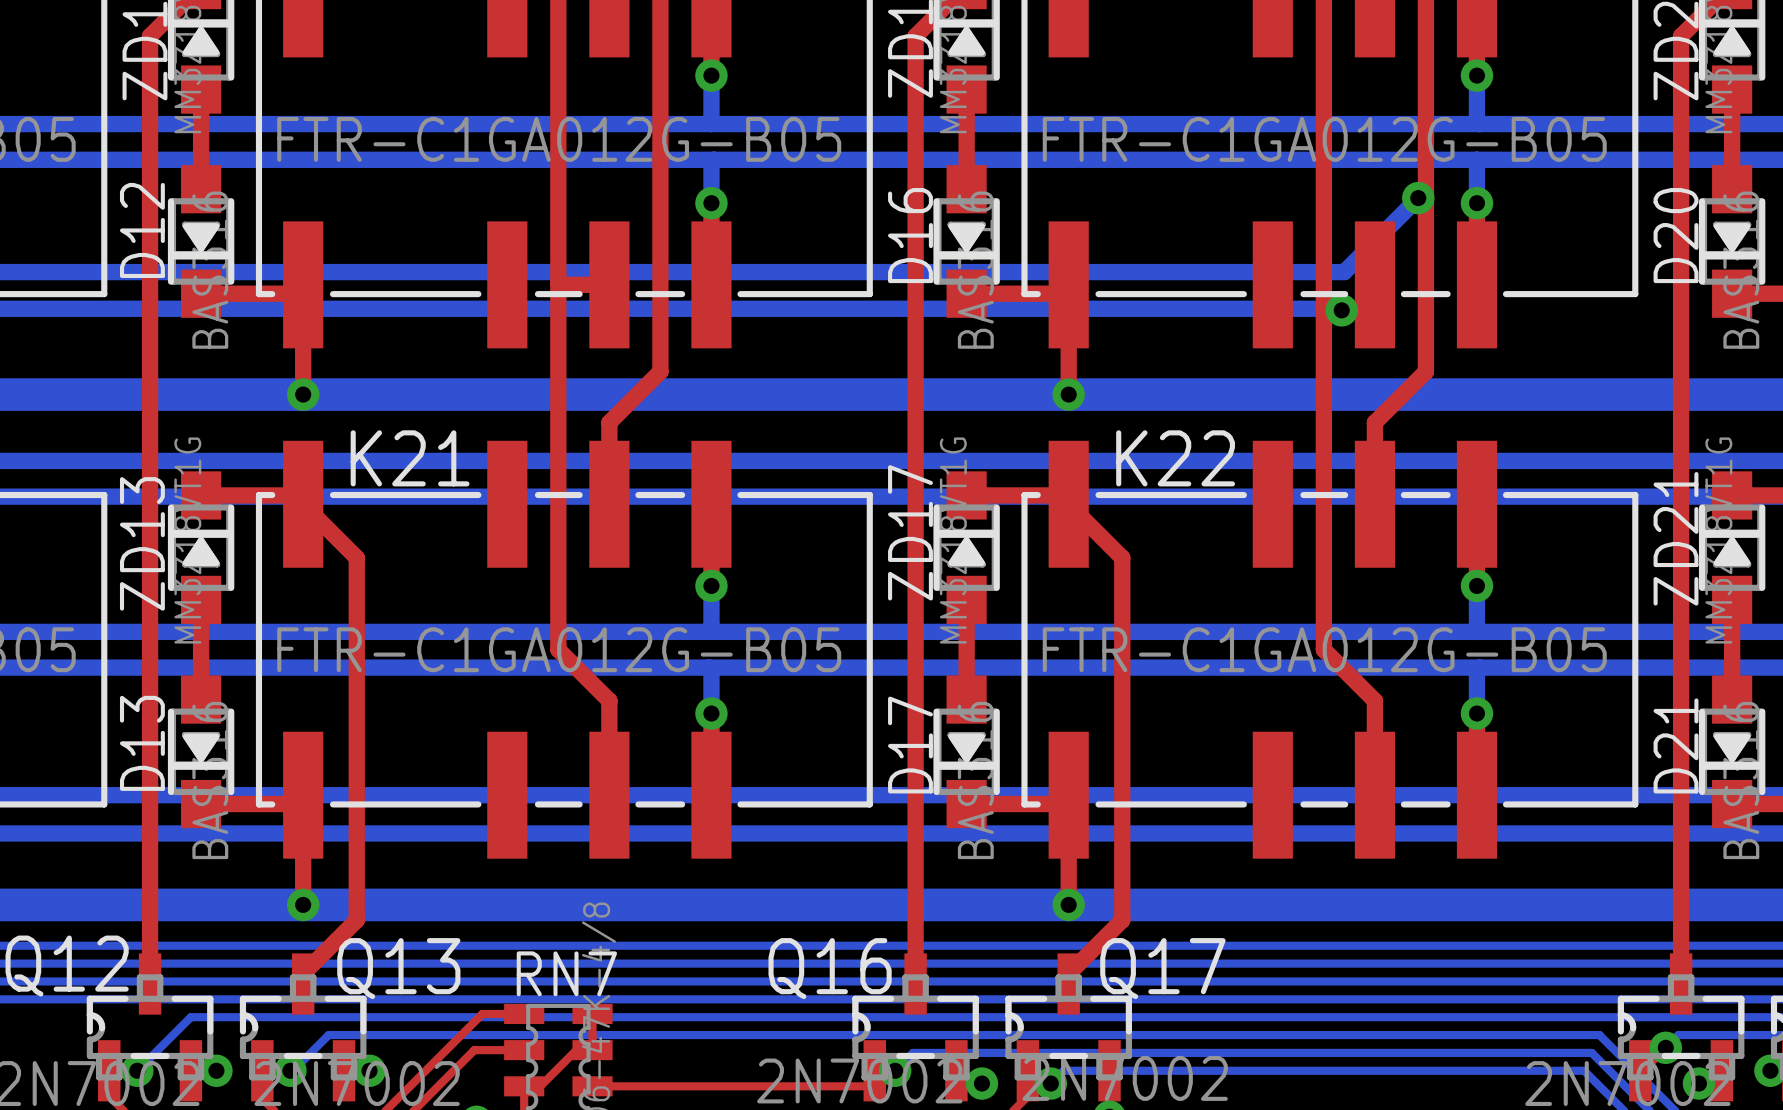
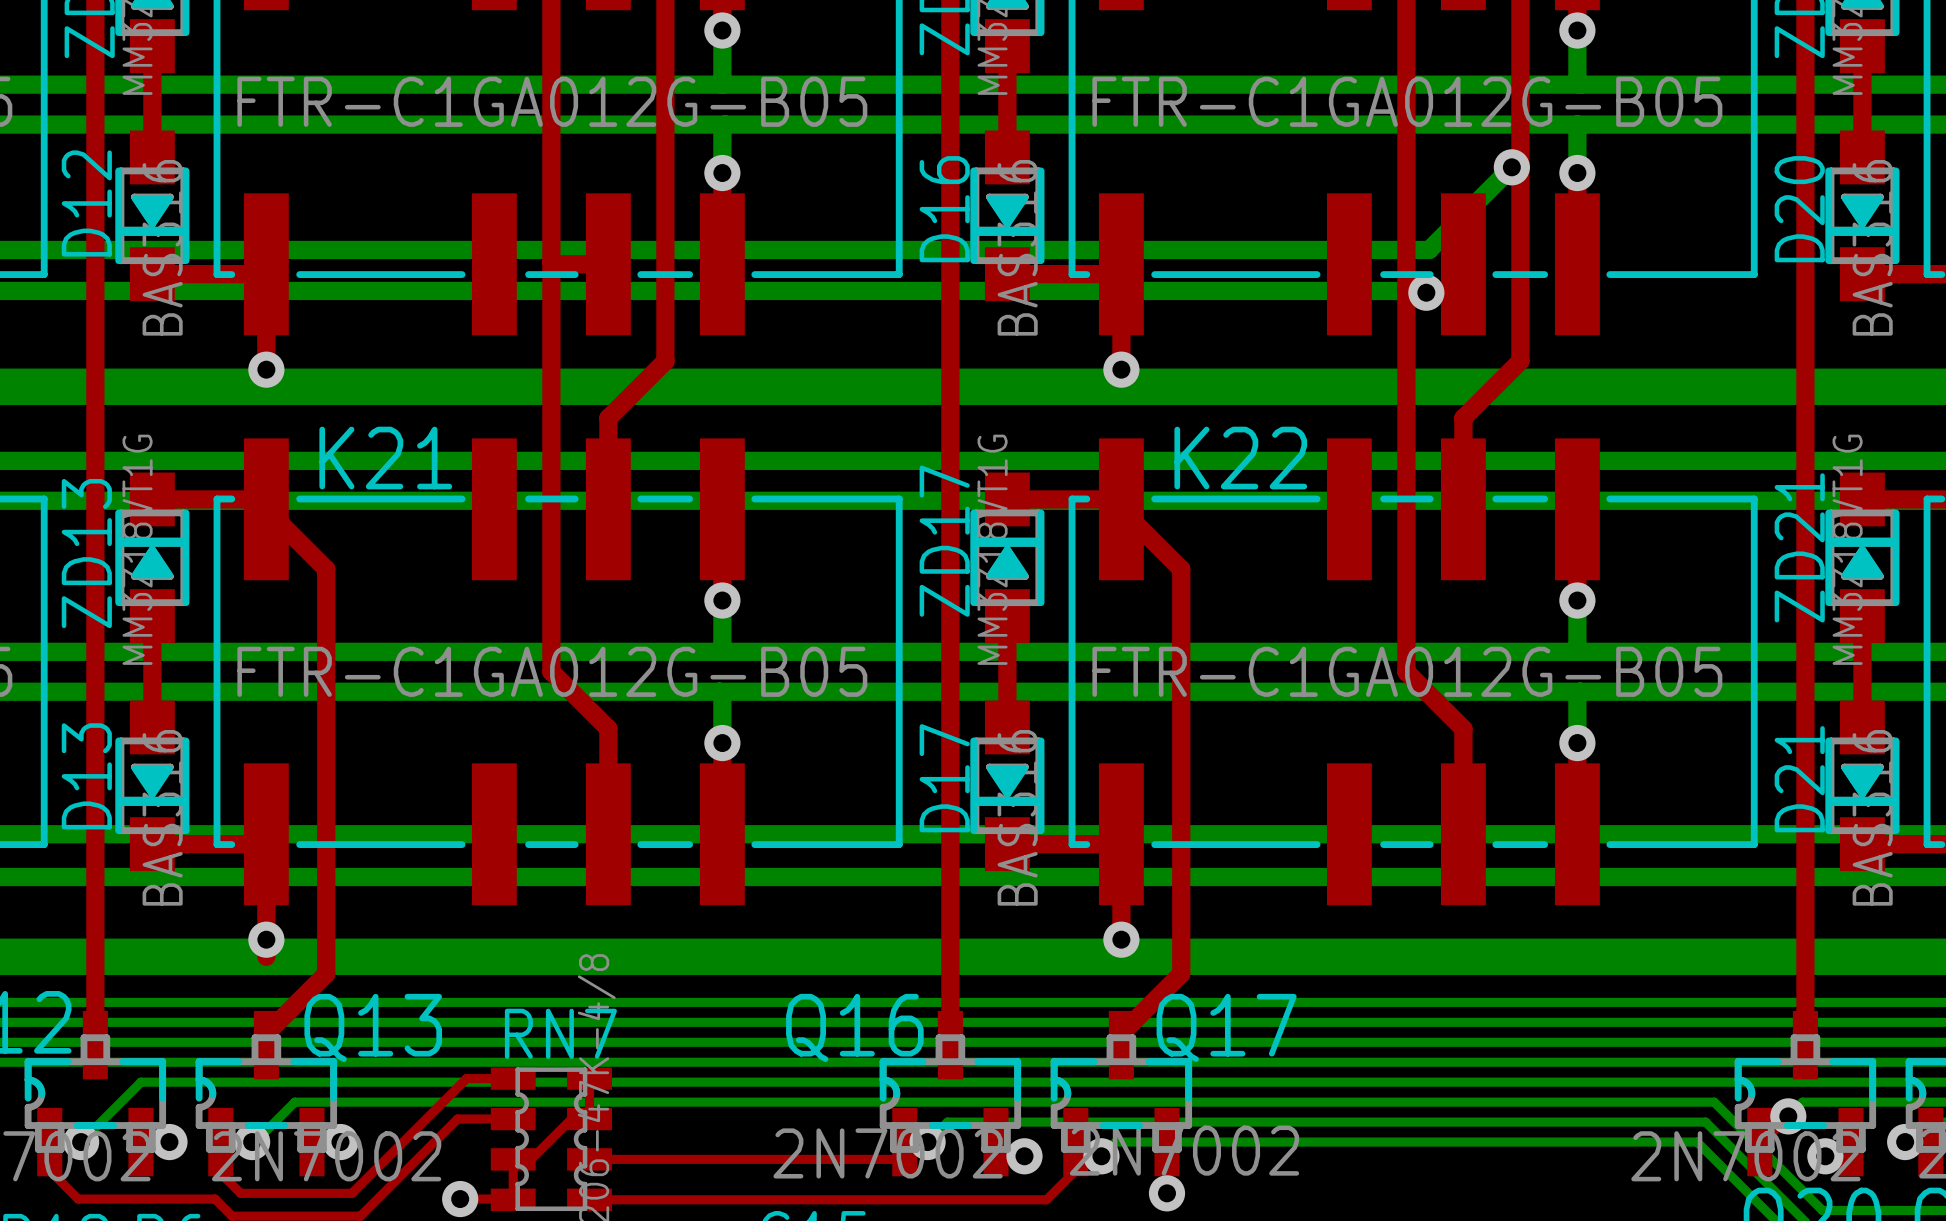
via position: (303, 394) -> (266, 369)
via position: (1068, 394) -> (1121, 369)
via position: (303, 904) -> (266, 939)
via position: (1068, 904) -> (1121, 939)

